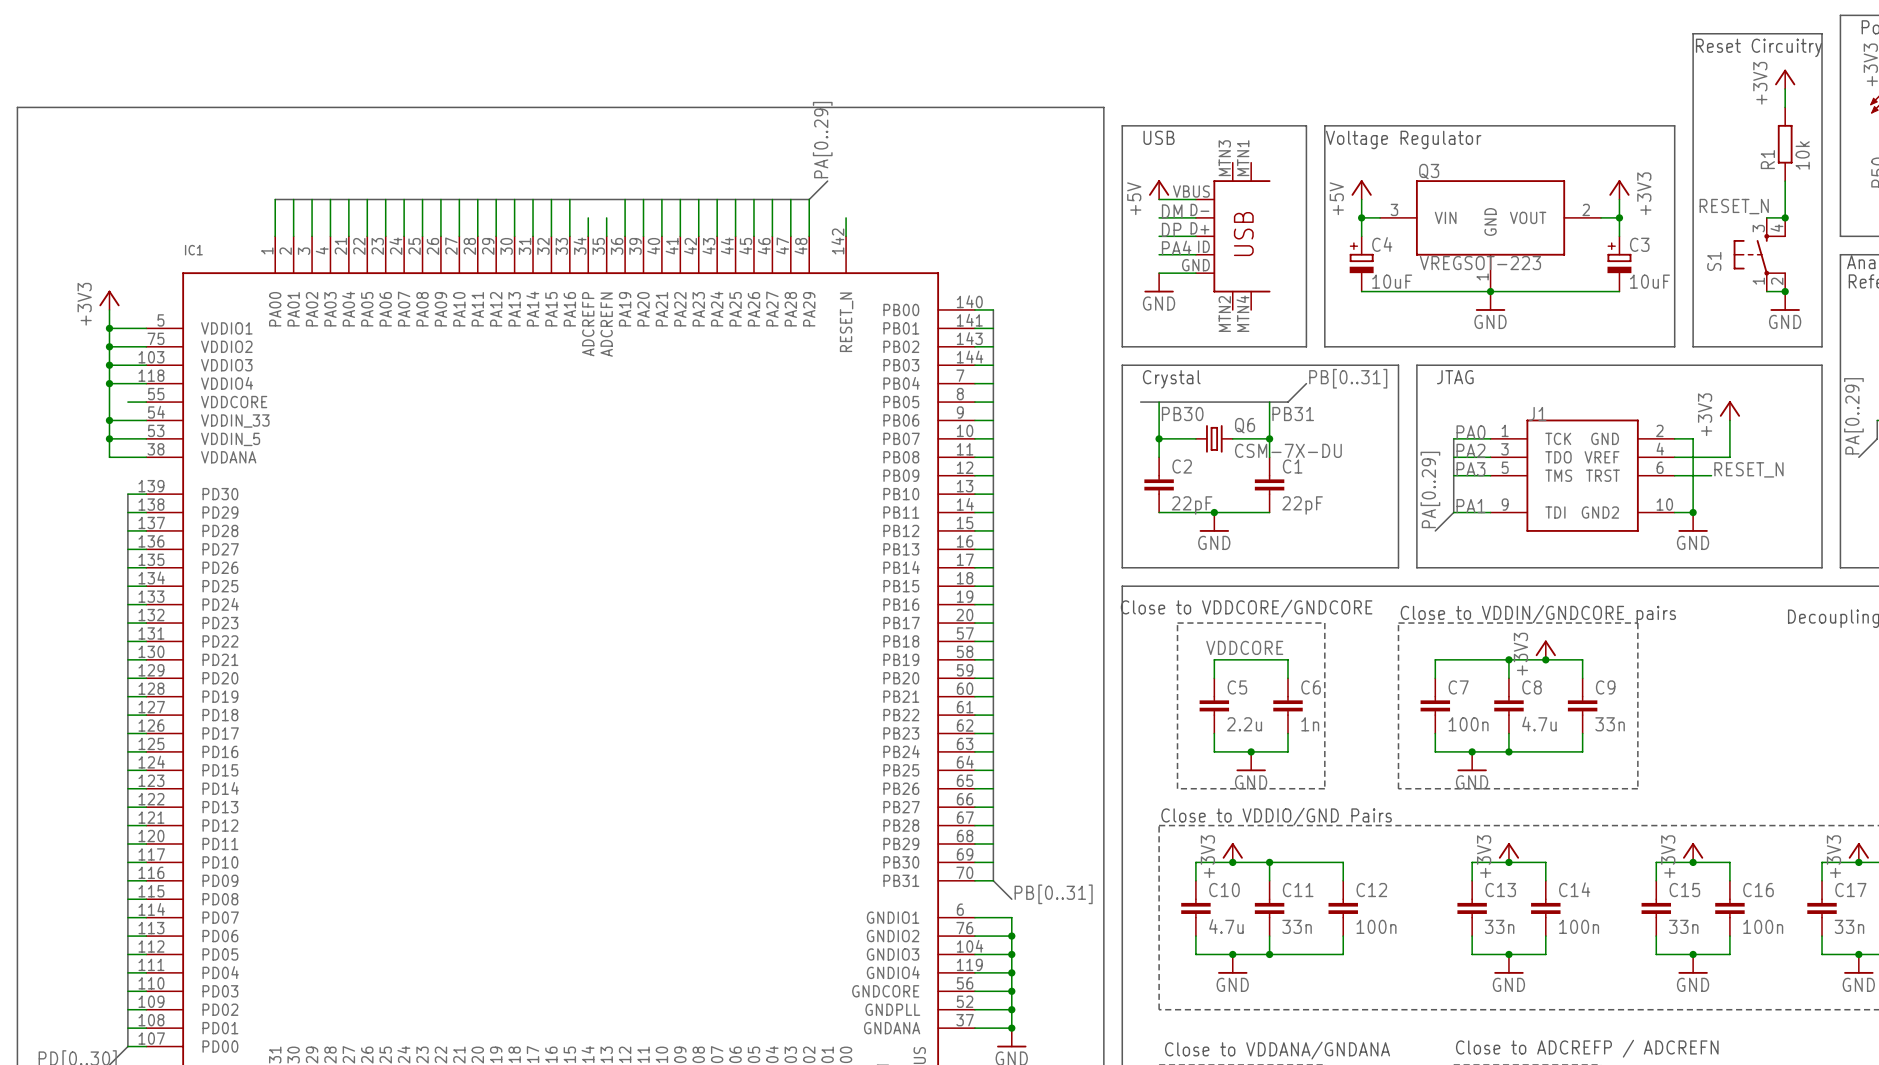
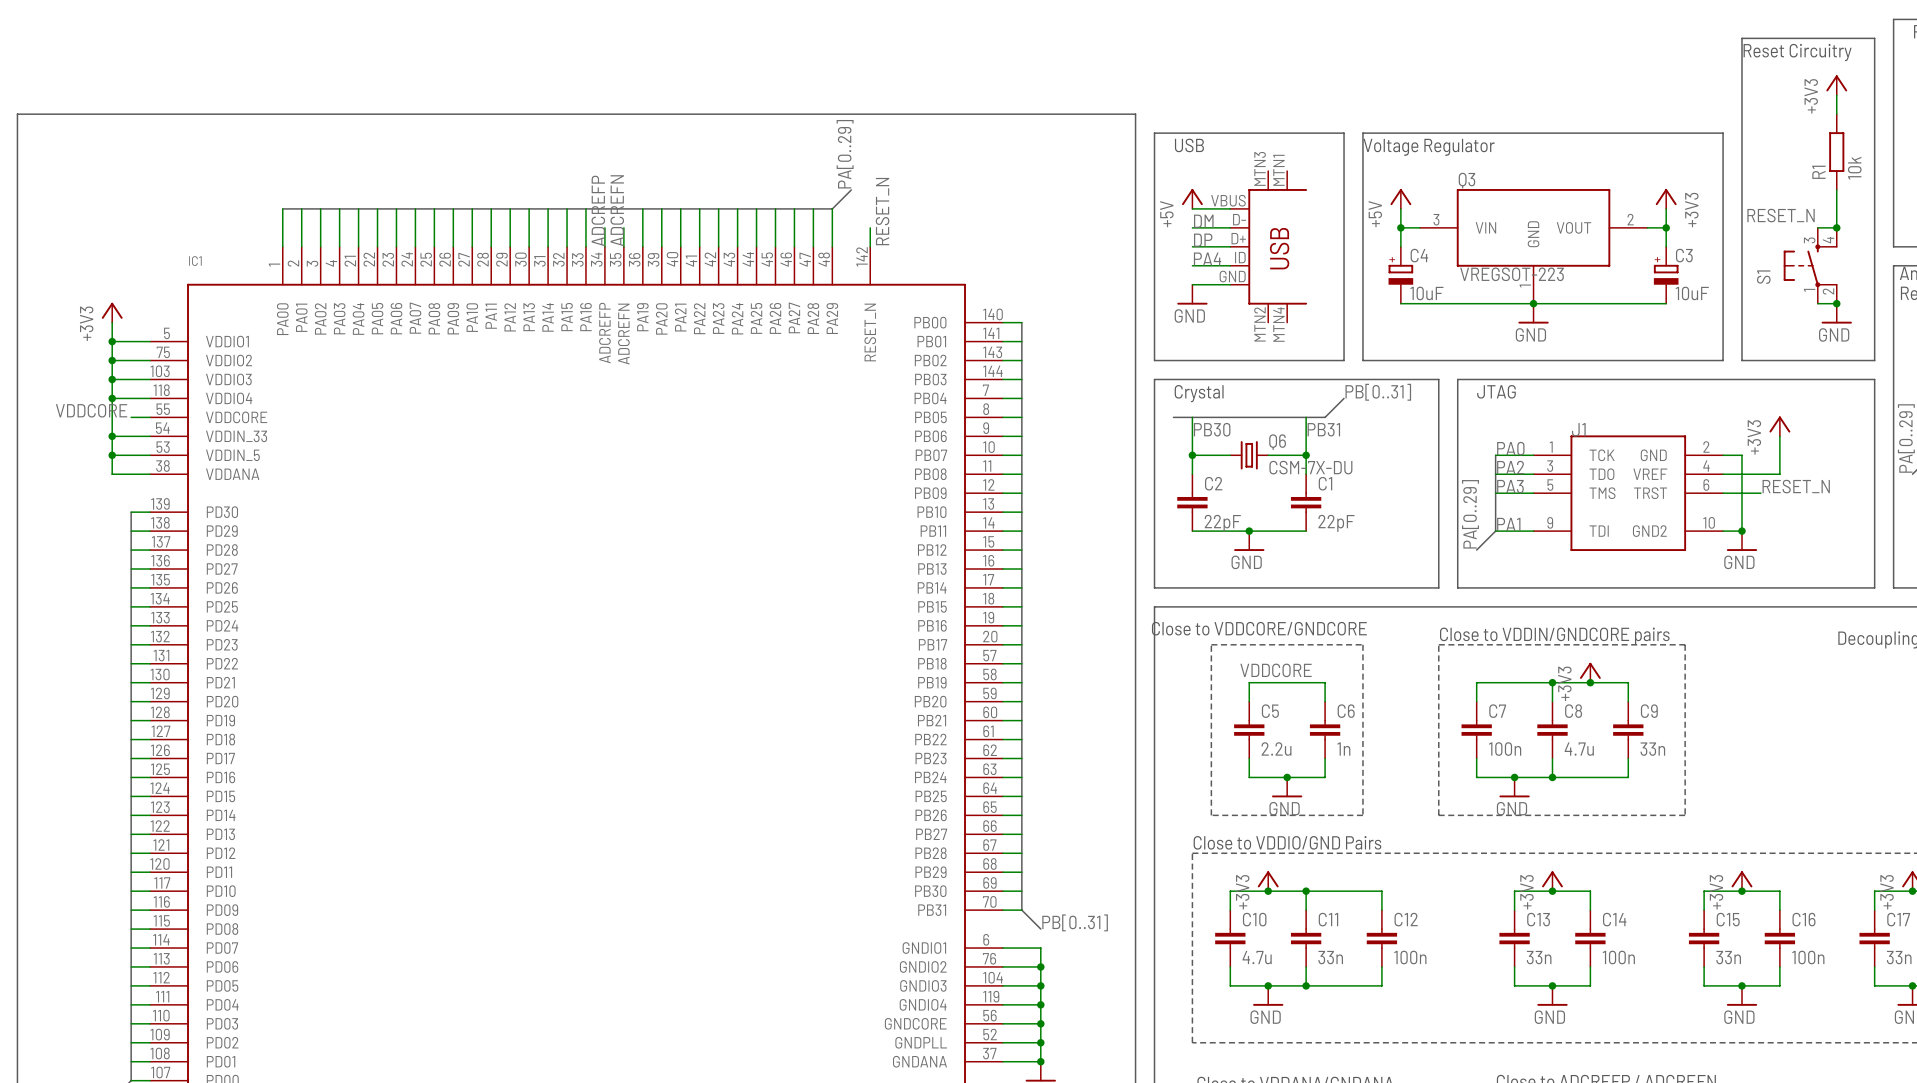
label: none -> ADCREFP (598, 210)
label: none -> ADCREFN (617, 210)
label: none -> RESET_N (882, 211)
label: none -> VDDCORE (91, 410)

